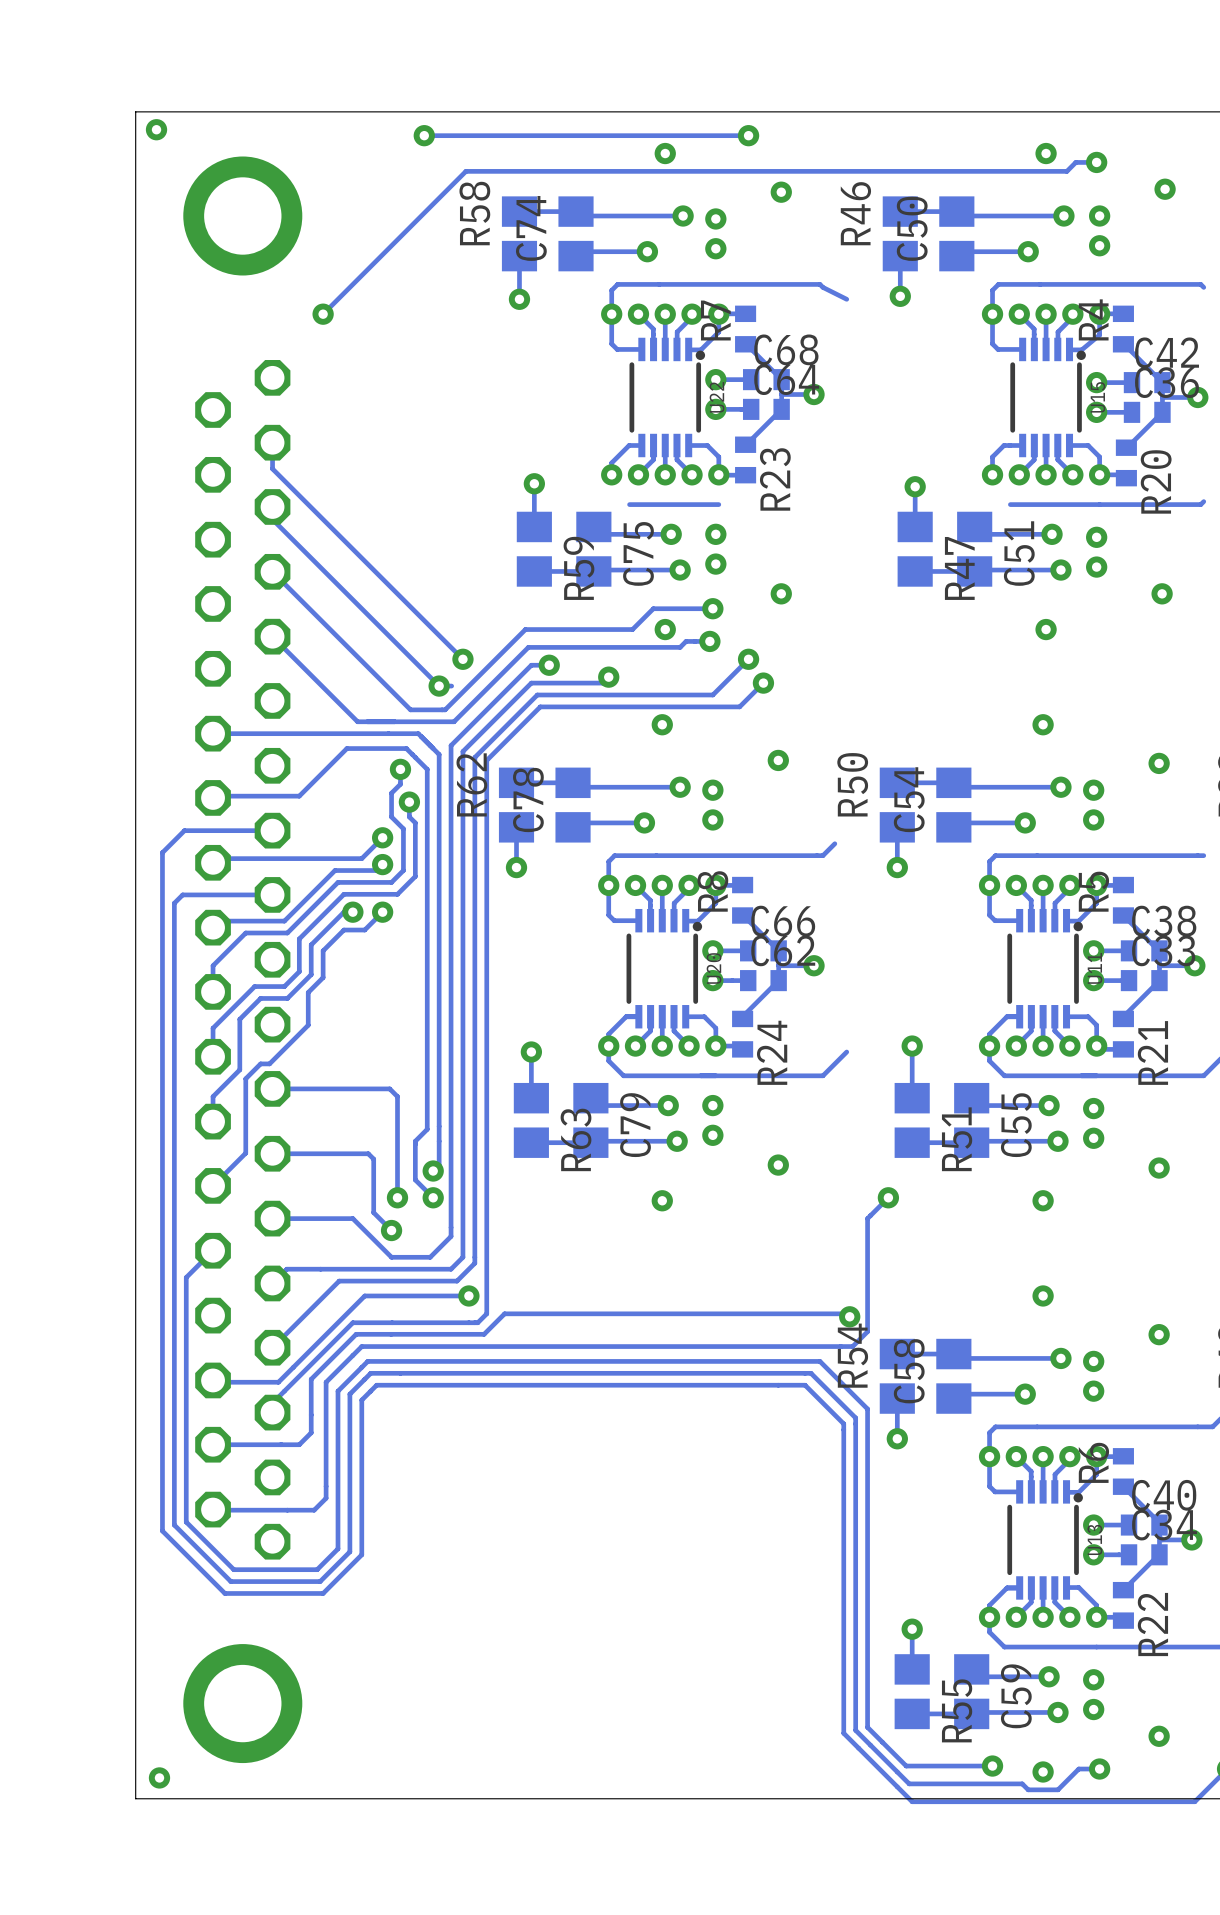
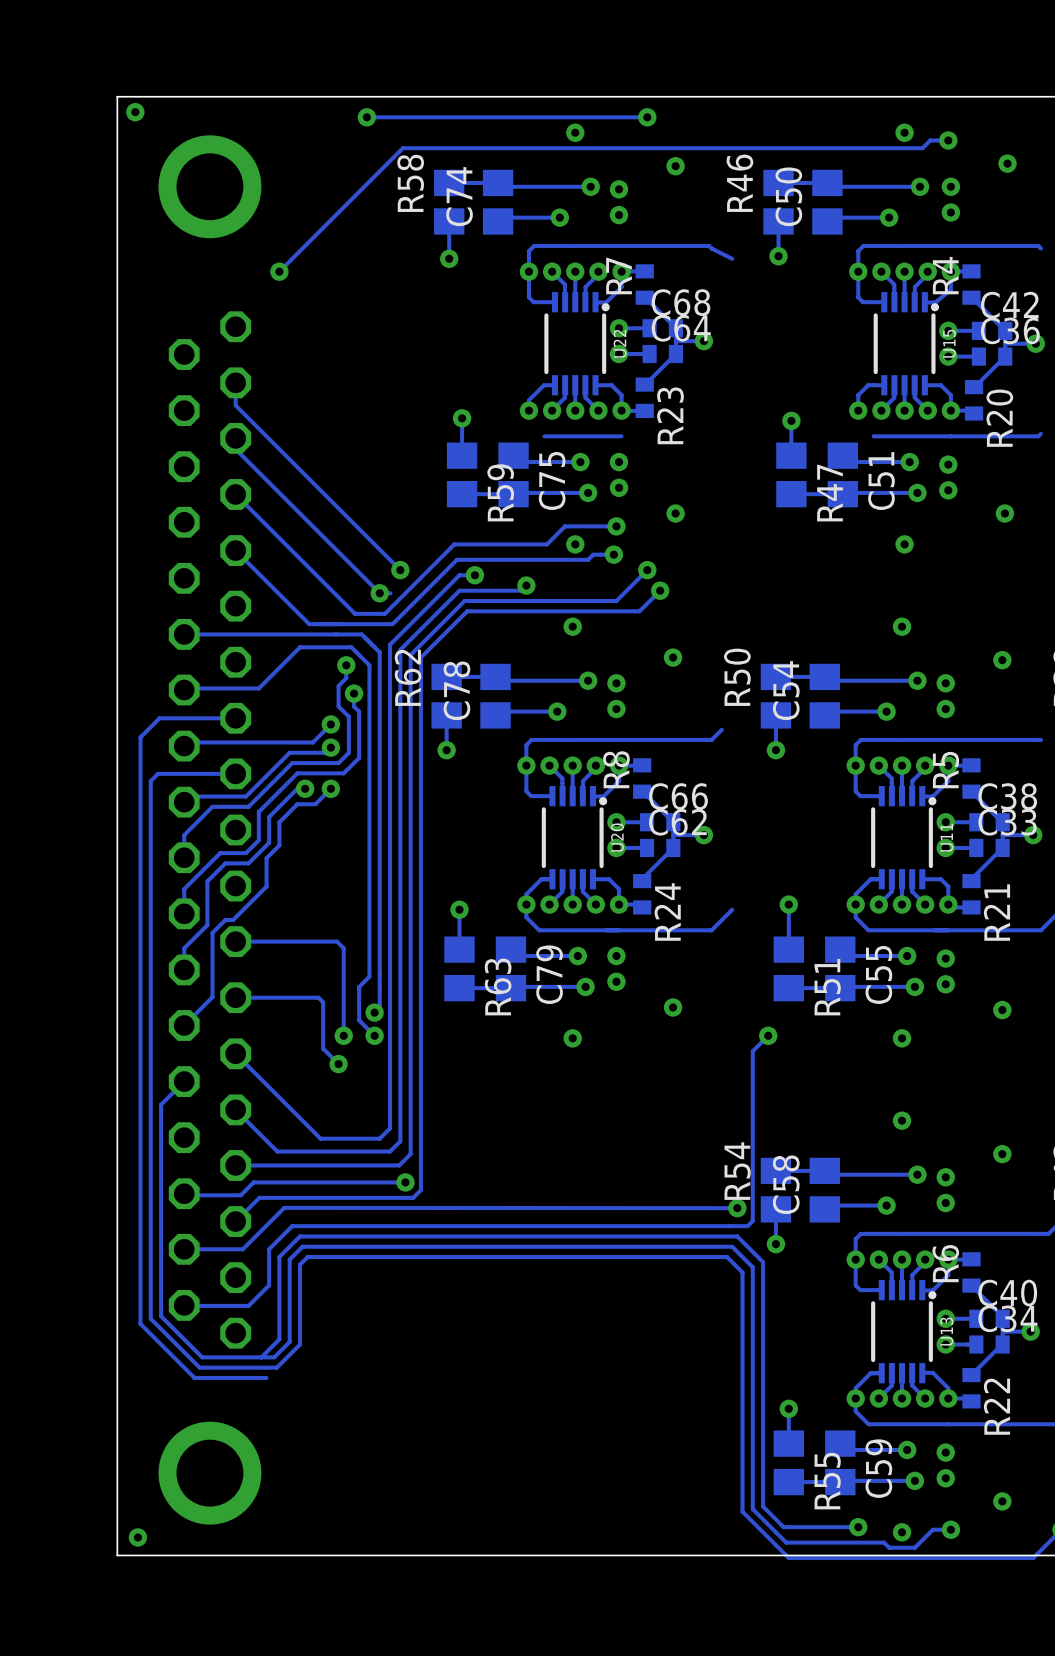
track: (870, 1215) (867, 1218) (867, 1331) (852, 1346) (361, 1346) (326, 1382) (326, 1498) (314, 1510) (287, 1510) -> (752, 1051) (752, 1221) (747, 1226) (292, 1226) (269, 1249) (269, 1285) (248, 1305)
track: (272, 1218) (352, 1218) (391, 1257) (430, 1257) (451, 1236) -> (235, 1053) (320, 1138) (379, 1138) (390, 1128) (390, 1069)
track: (462, 1257) (451, 1269) (286, 1269) (272, 1283) -> (400, 1087) (400, 1141) (390, 1151) (277, 1151) (235, 1109)
track: (474, 1263) (457, 1281) (339, 1281) (273, 1346) -> (410, 1092) (410, 1154) (399, 1165) (235, 1165)
track: (468, 1295) (364, 1295) (293, 1367) -> (405, 1182) (253, 1182)
via position: (468, 1295) -> (405, 1182)
track: (486, 1313) (477, 1322) (352, 1322) (272, 1403) (272, 1412) -> (325, 1197) (259, 1197) (235, 1221)
track: (849, 1316) (846, 1313) (504, 1313) (484, 1334) (356, 1334) (311, 1379) (311, 1432) (299, 1444) (280, 1444) -> (737, 1208) (284, 1207) (242, 1249)
via position: (849, 1316) -> (737, 1208)
track: (376, 1385) (361, 1400) (361, 1554) (323, 1593) (308, 1593) -> none
track: (477, 1385) (805, 1385) (843, 1423) (843, 1733) (858, 1748) -> (413, 1197) (420, 1190) (420, 1136)
track: (335, 1551) (338, 1548) (338, 1391) (367, 1361) (819, 1361) (867, 1409) (867, 1727) (882, 1742) -> (289, 1341) (289, 1259) (302, 1246) (732, 1246) (752, 1267) (752, 1509)
track: (346, 1554) (349, 1551) (349, 1394) (370, 1373) (811, 1373) (855, 1417) (855, 1730) (870, 1745) -> (300, 1344) (300, 1264) (307, 1257) (727, 1257) (742, 1272) (742, 1511)
track: none -> (261, 1357) (279, 1339) (279, 1257) (300, 1236) (737, 1236) (763, 1262) (763, 1506)

